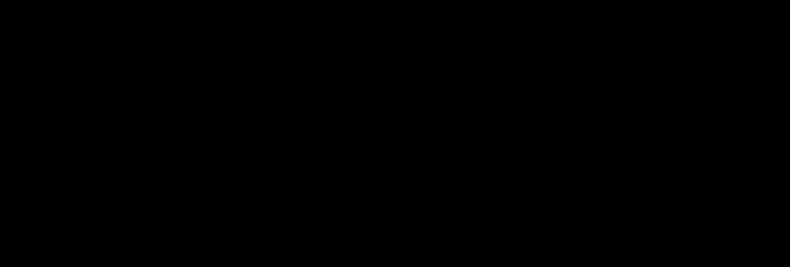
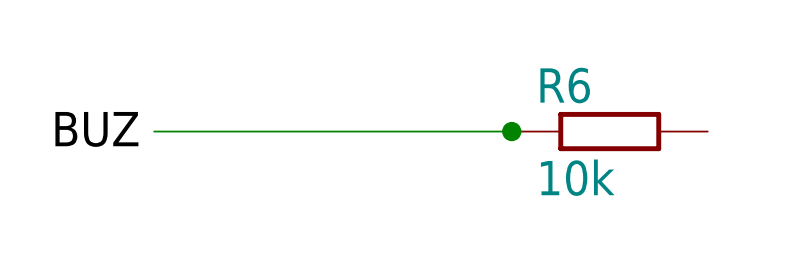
label: none -> BUZ (96, 129)
wire: none -> (154, 131) (521, 131)
junction: none -> (511, 131)
R6: none -> 10k (609, 131)

